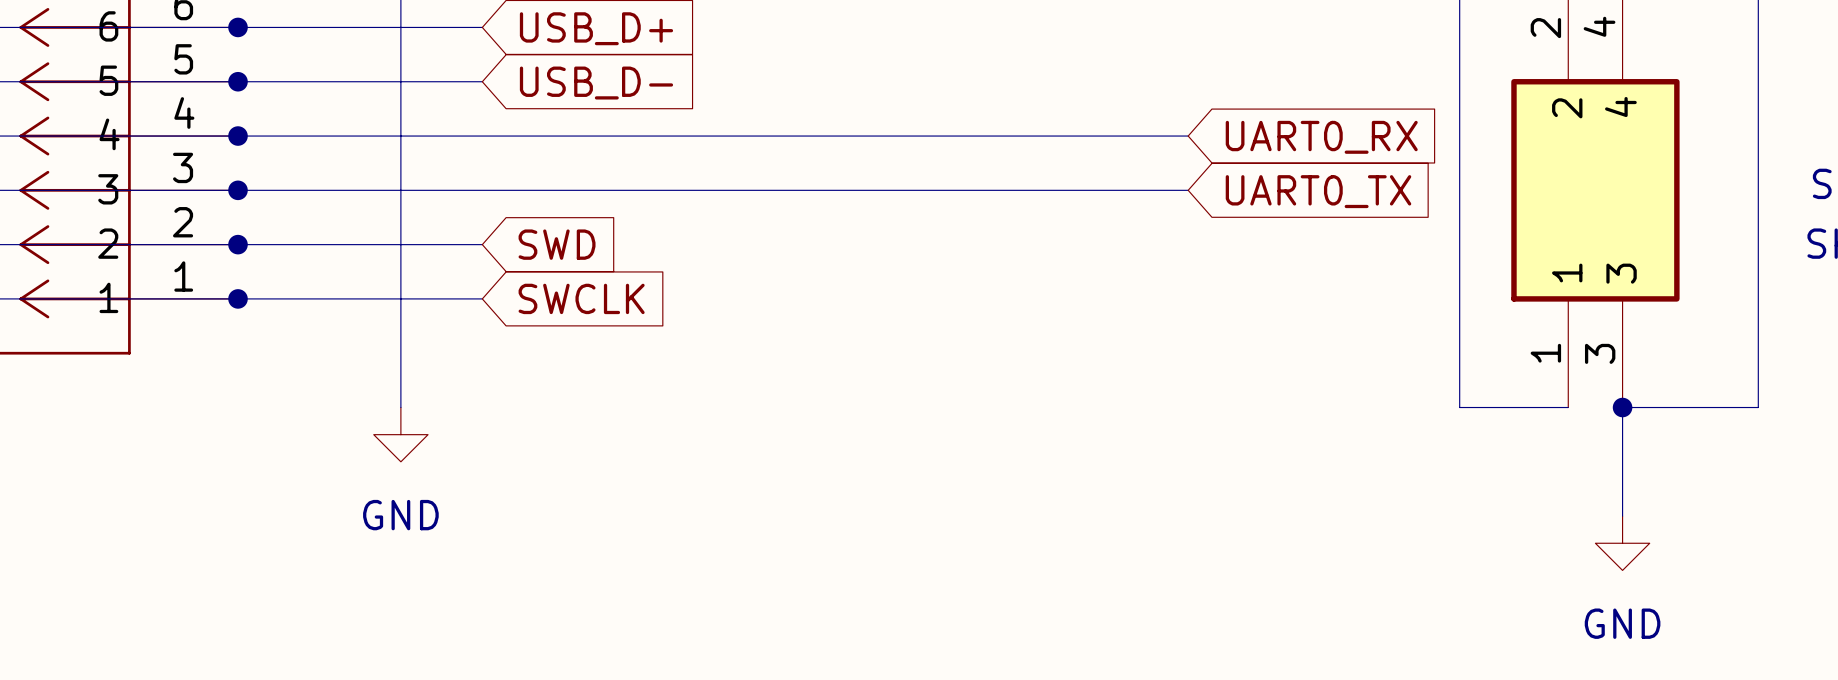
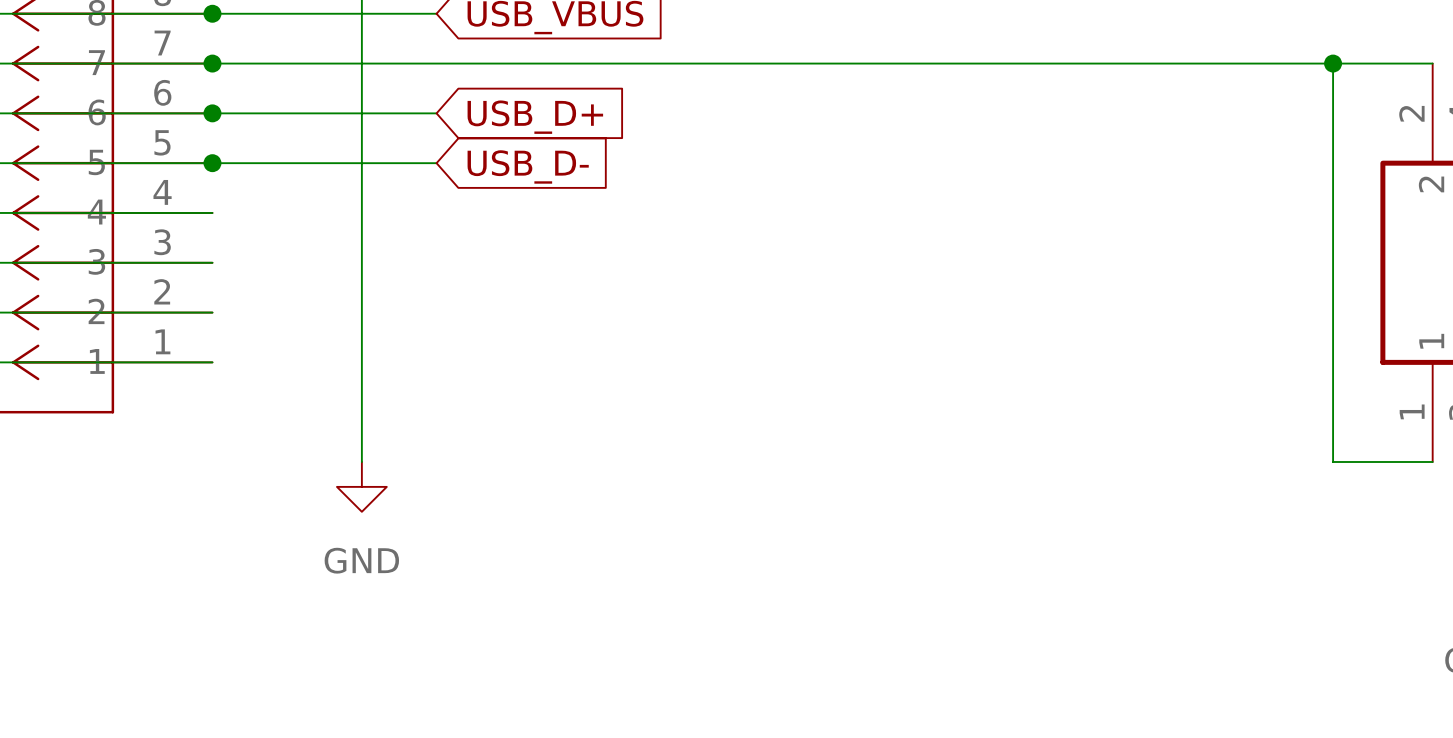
wire: (238, 136) (1188, 136) -> none
junction: (238, 136) -> none
global label: UART0_RX (1321, 137) -> none
wire: (238, 190) (1188, 190) -> none
junction: (238, 190) -> none
global label: UART0_TX (1318, 191) -> none
wire: (238, 244) (482, 244) -> none
junction: (238, 244) -> none
global label: SWD (557, 244) -> none
wire: (238, 298) (482, 298) -> none
junction: (238, 298) -> none
global label: SWCLK (581, 298) -> none

